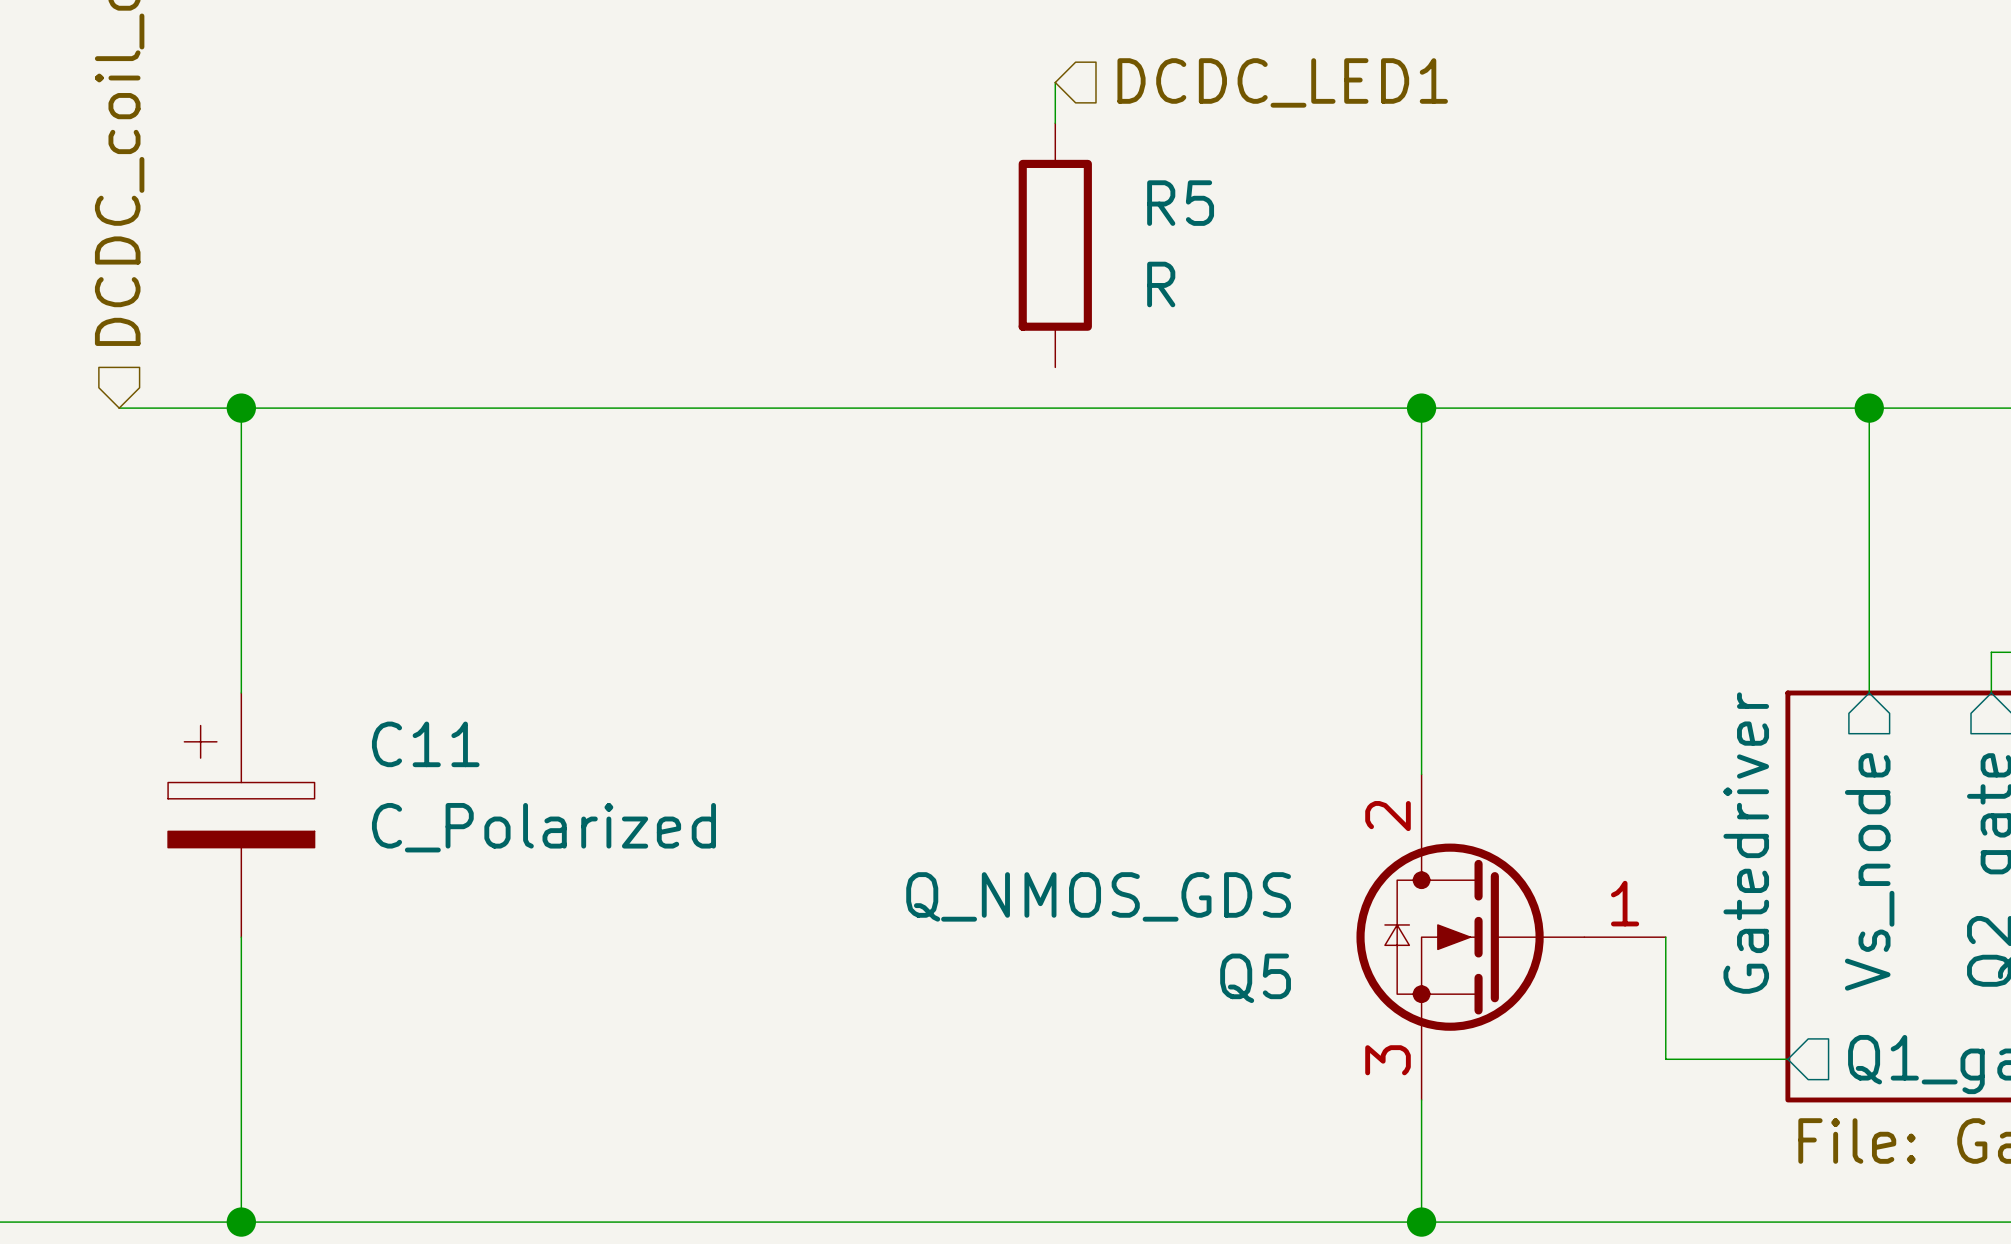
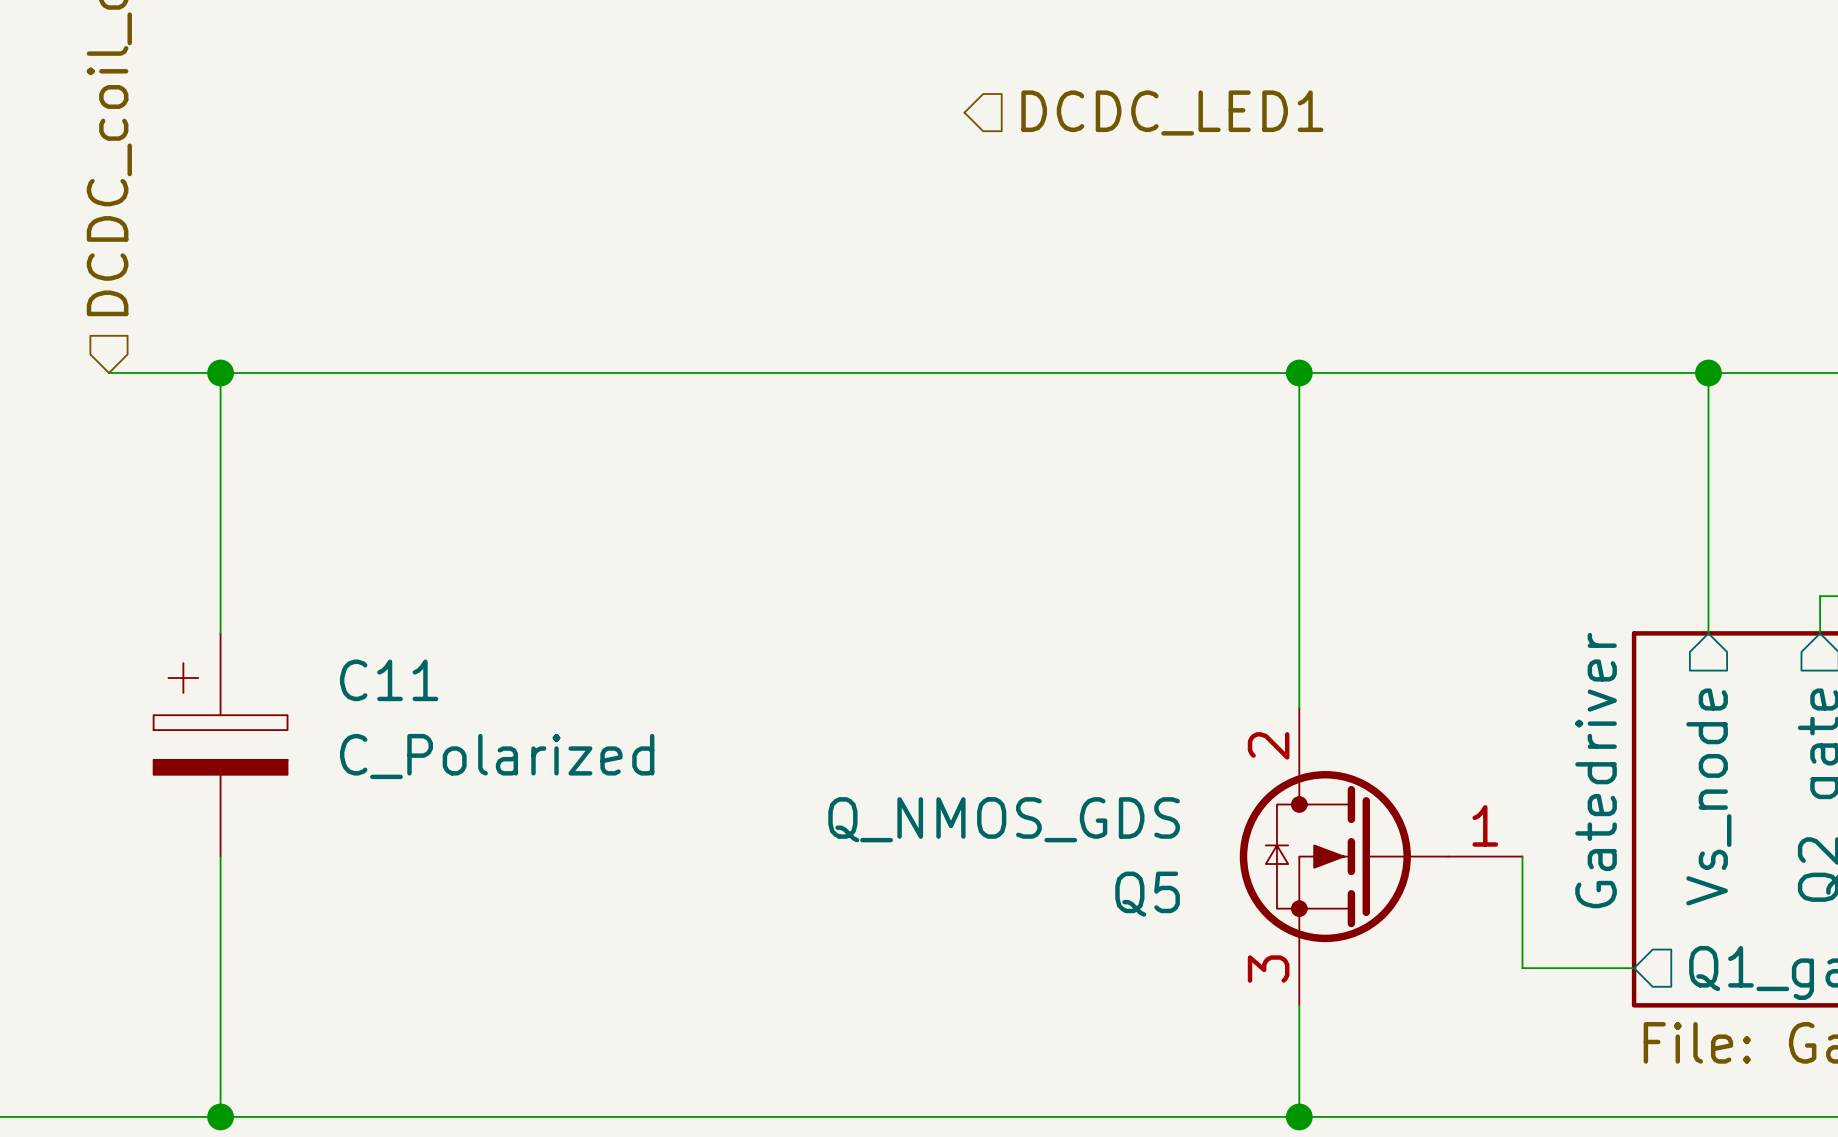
wire: (1055, 82) (1055, 123) -> none
hierarchical label position: DCDC_LED1 (1282, 82) -> DCDC_LED1 (1172, 113)
R5: R (1055, 245) -> none

